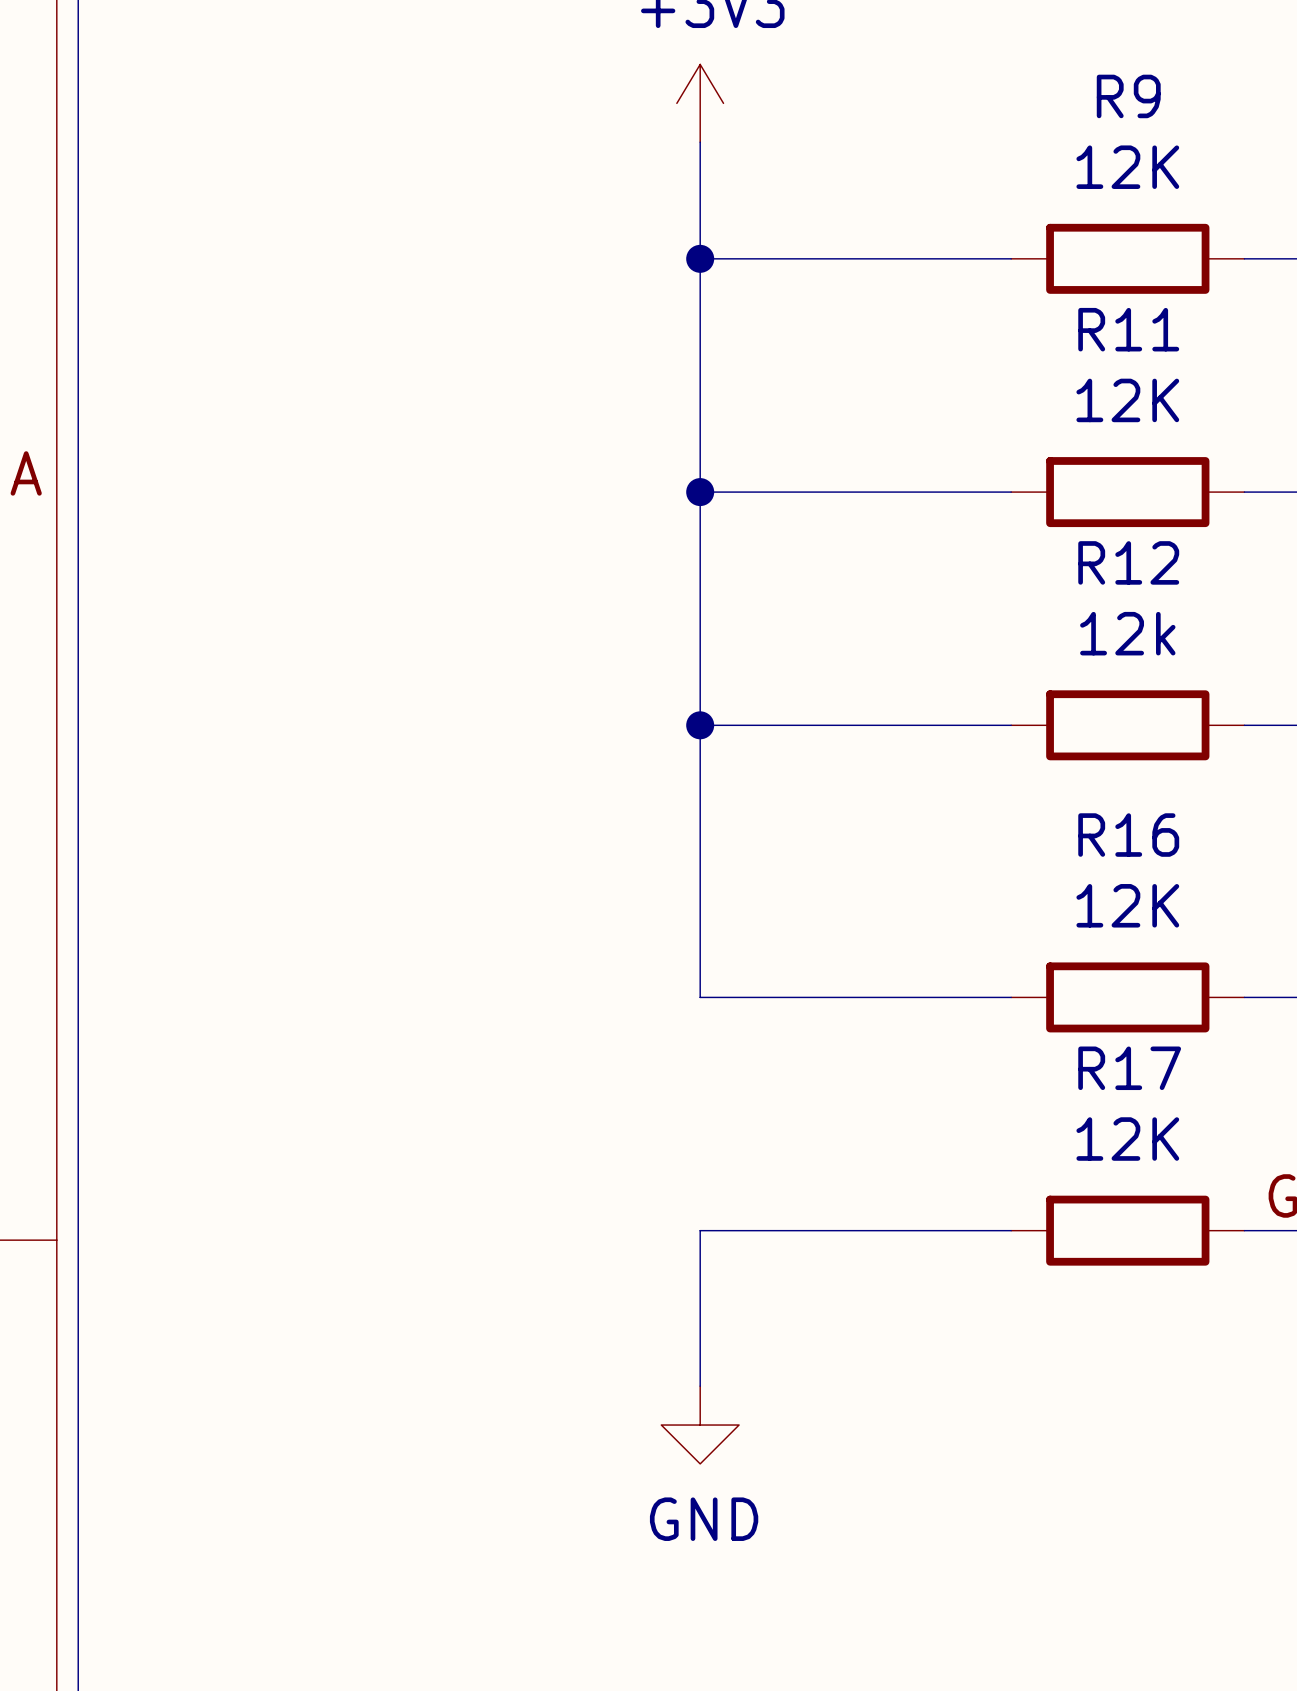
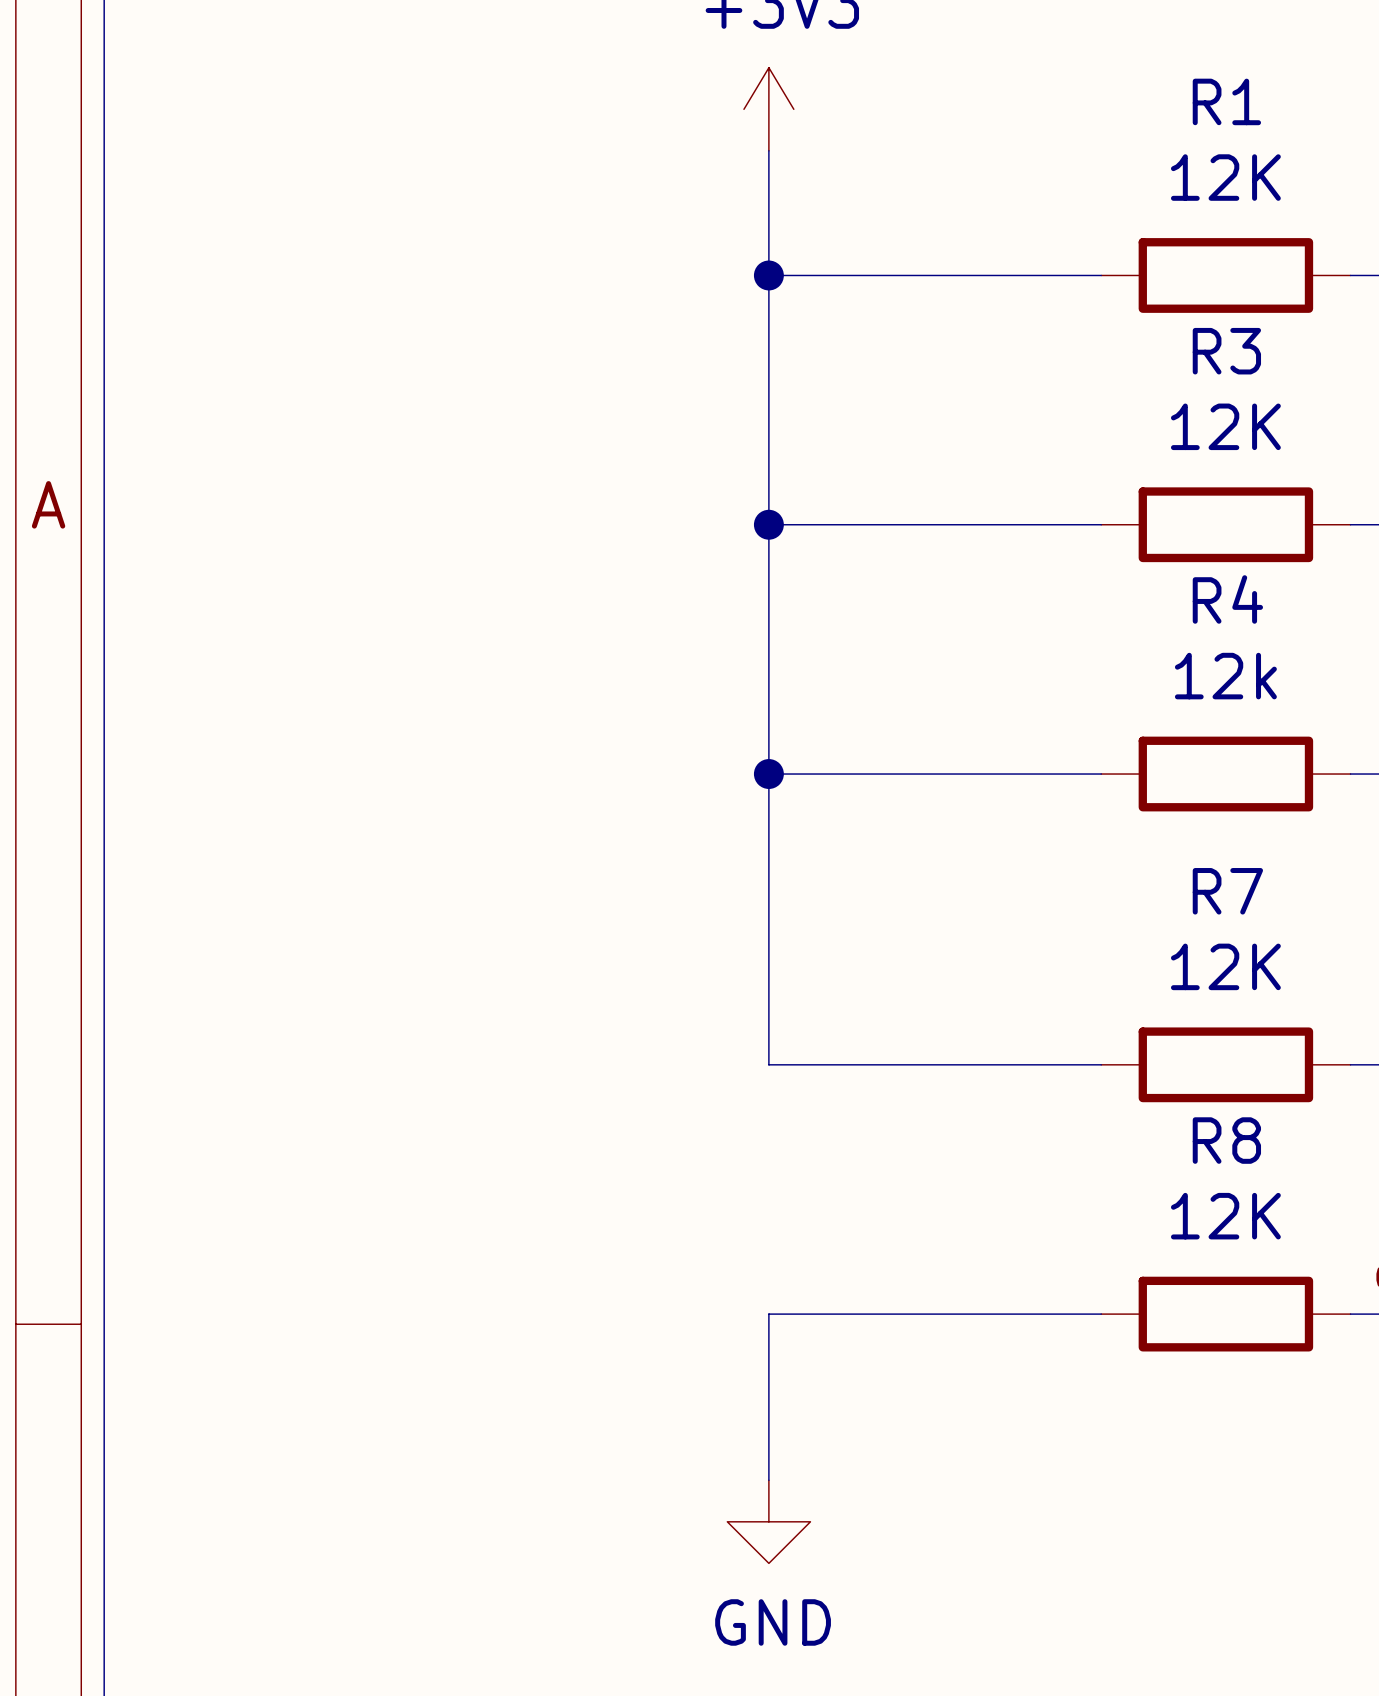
R9 name: R9 (1128, 96) -> R1 (1226, 101)
R11 name: R11 (1128, 329) -> R3 (1226, 351)
R12 name: R12 (1128, 562) -> R4 (1227, 599)
R16 name: R16 (1128, 835) -> R7 (1227, 891)
R17 name: R17 (1129, 1068) -> R8 (1226, 1140)

